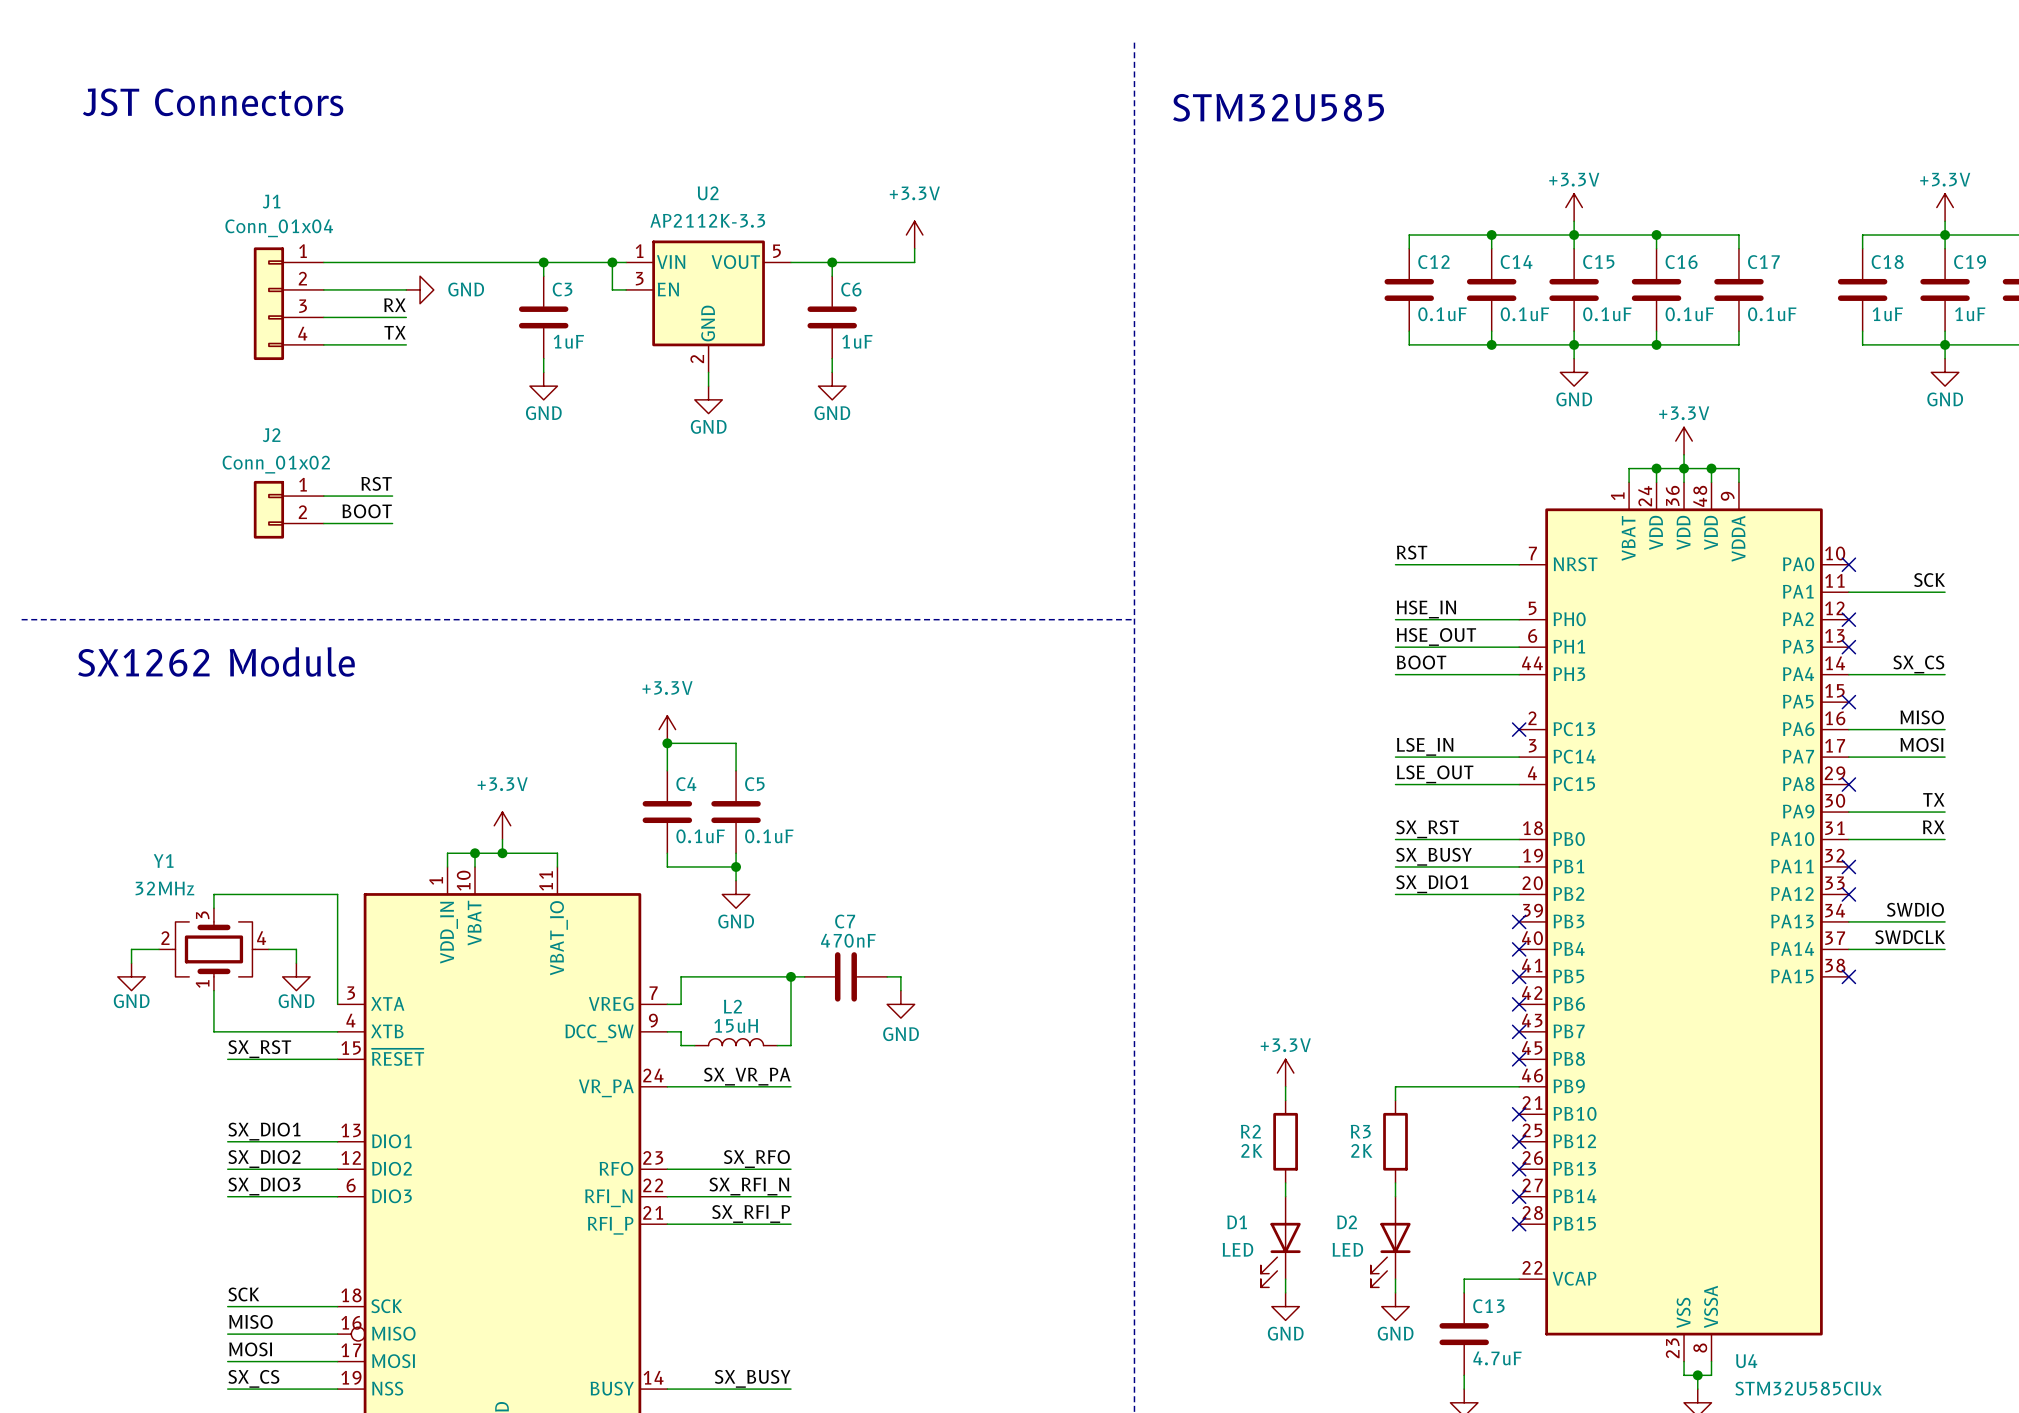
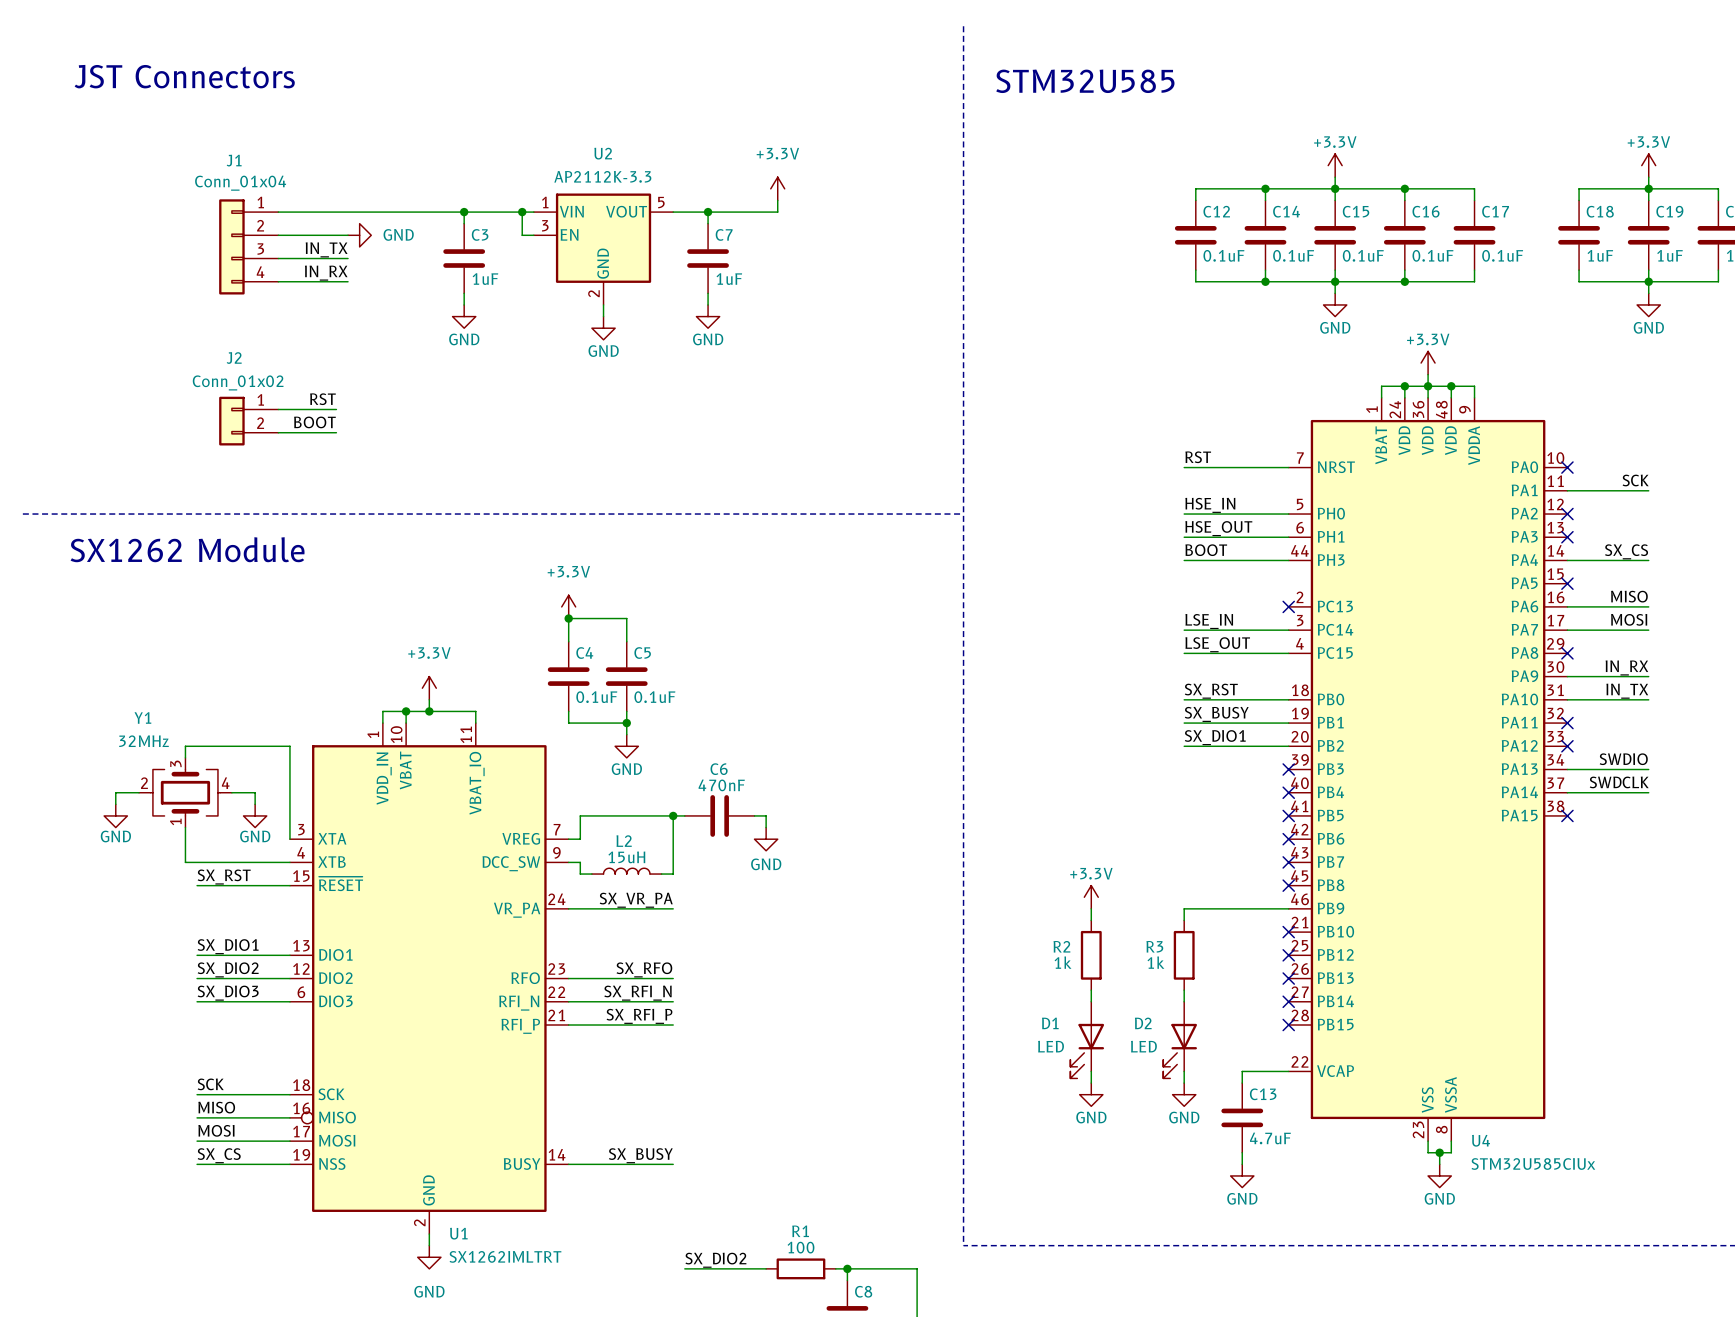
C6 name: C6 (851, 289) -> C7 (724, 234)
label: RX (394, 305) -> IN_TX (326, 249)
label: TX (395, 332) -> IN_RX (326, 273)
label: TX (1933, 799) -> IN_RX (1626, 667)
label: RX (1933, 827) -> IN_TX (1627, 691)
C7 name: C7 (845, 921) -> C6 (719, 769)
R2 value: 2K (1251, 1150) -> 1k (1063, 962)
R3 value: 2K (1361, 1150) -> 1k (1155, 962)

